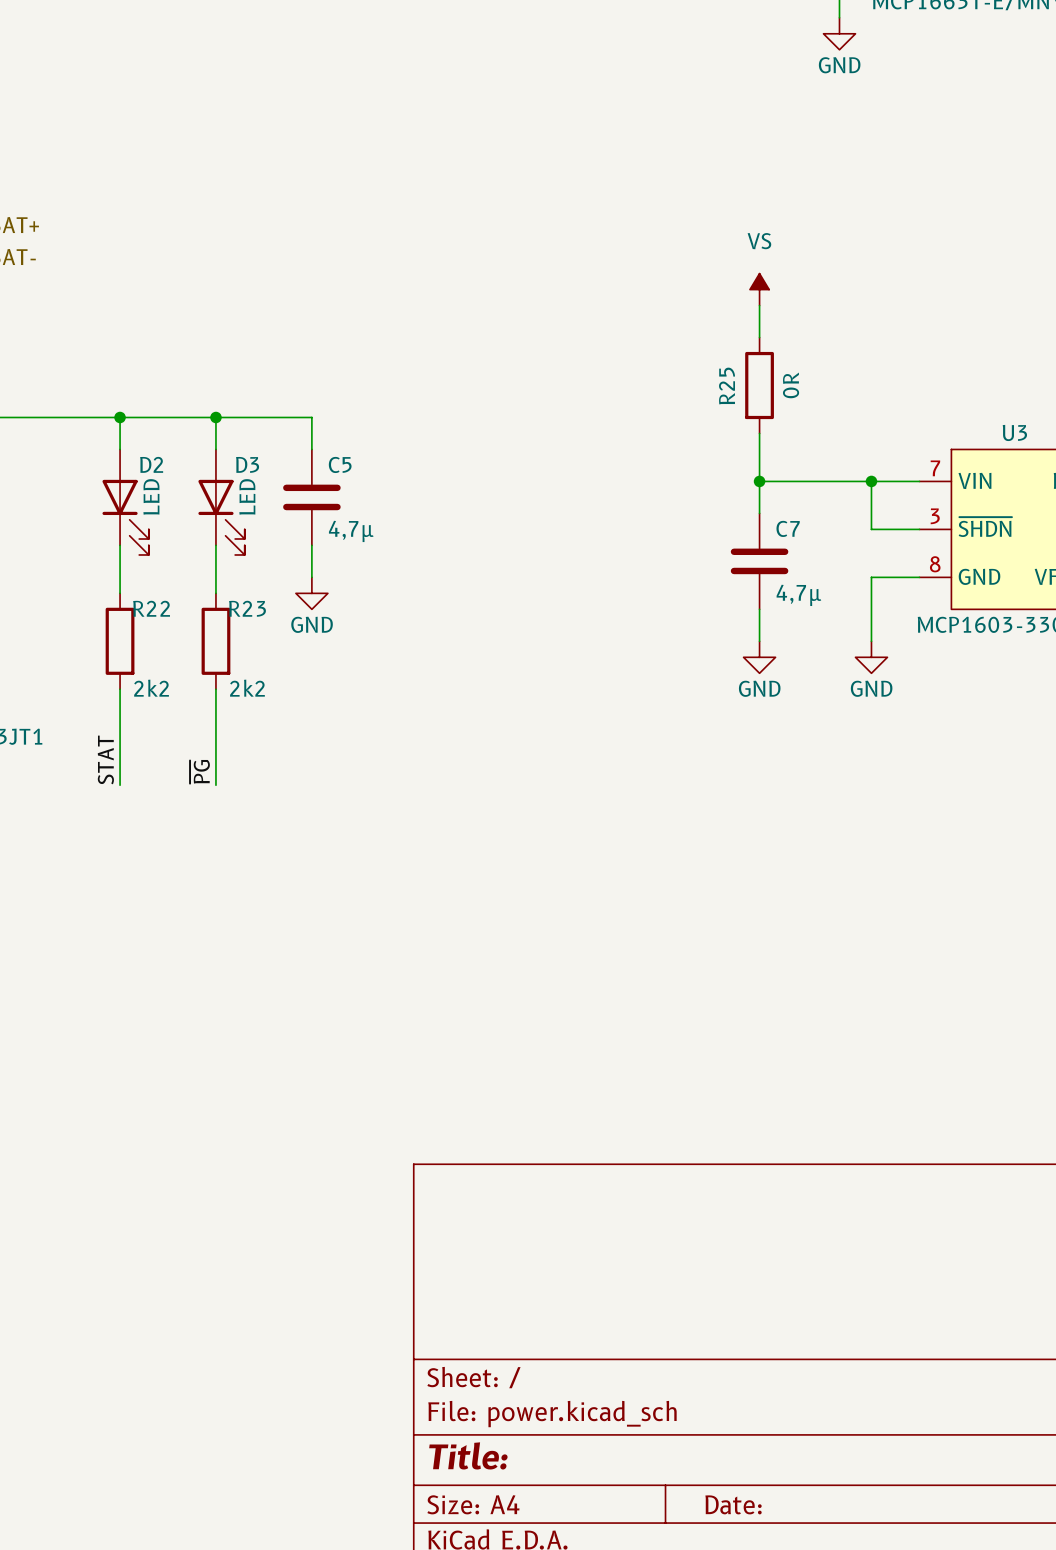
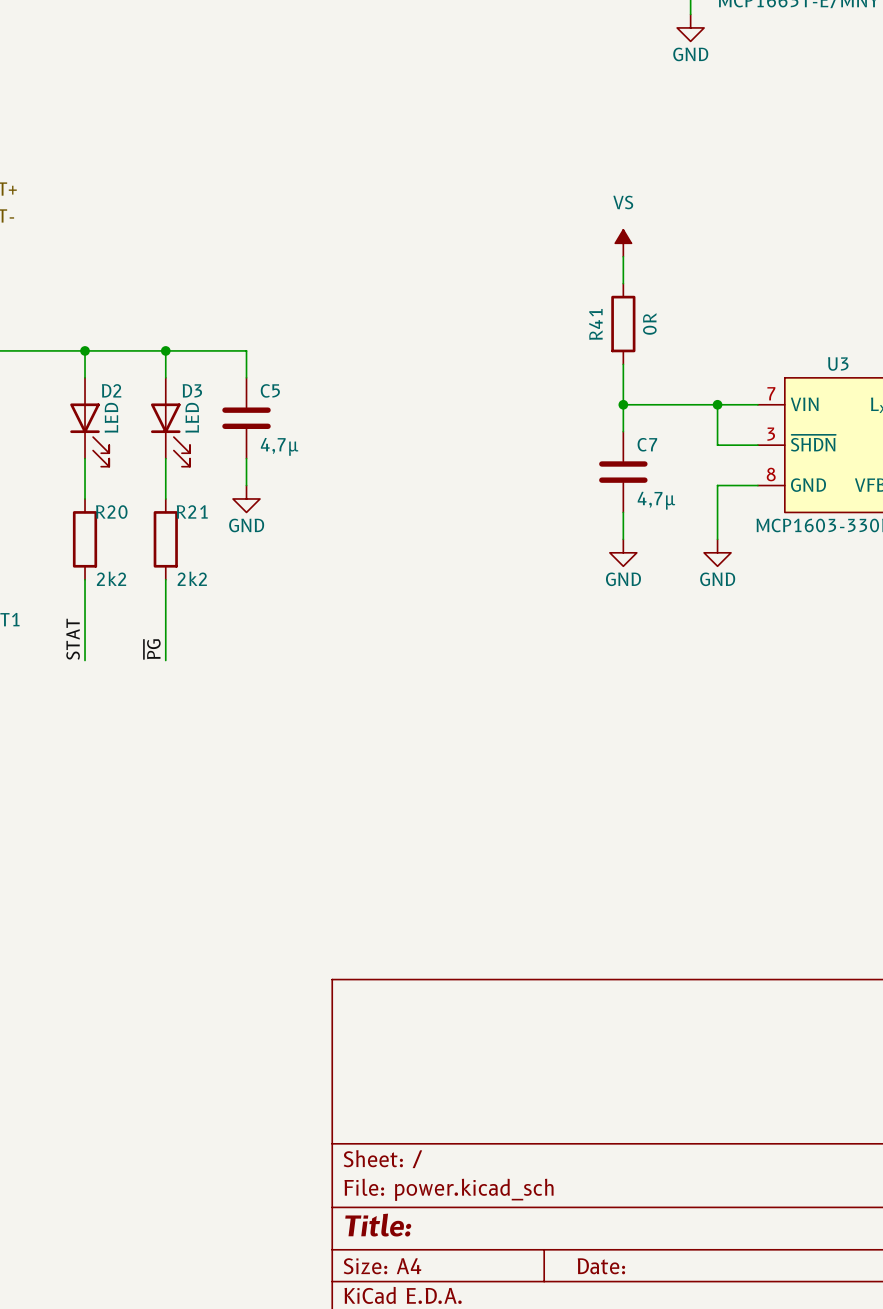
R25 name: R25 (727, 386) -> R41 (595, 324)
R22 name: R22 (151, 608) -> R20 (111, 512)
R23 name: R23 (247, 608) -> R21 (192, 511)

